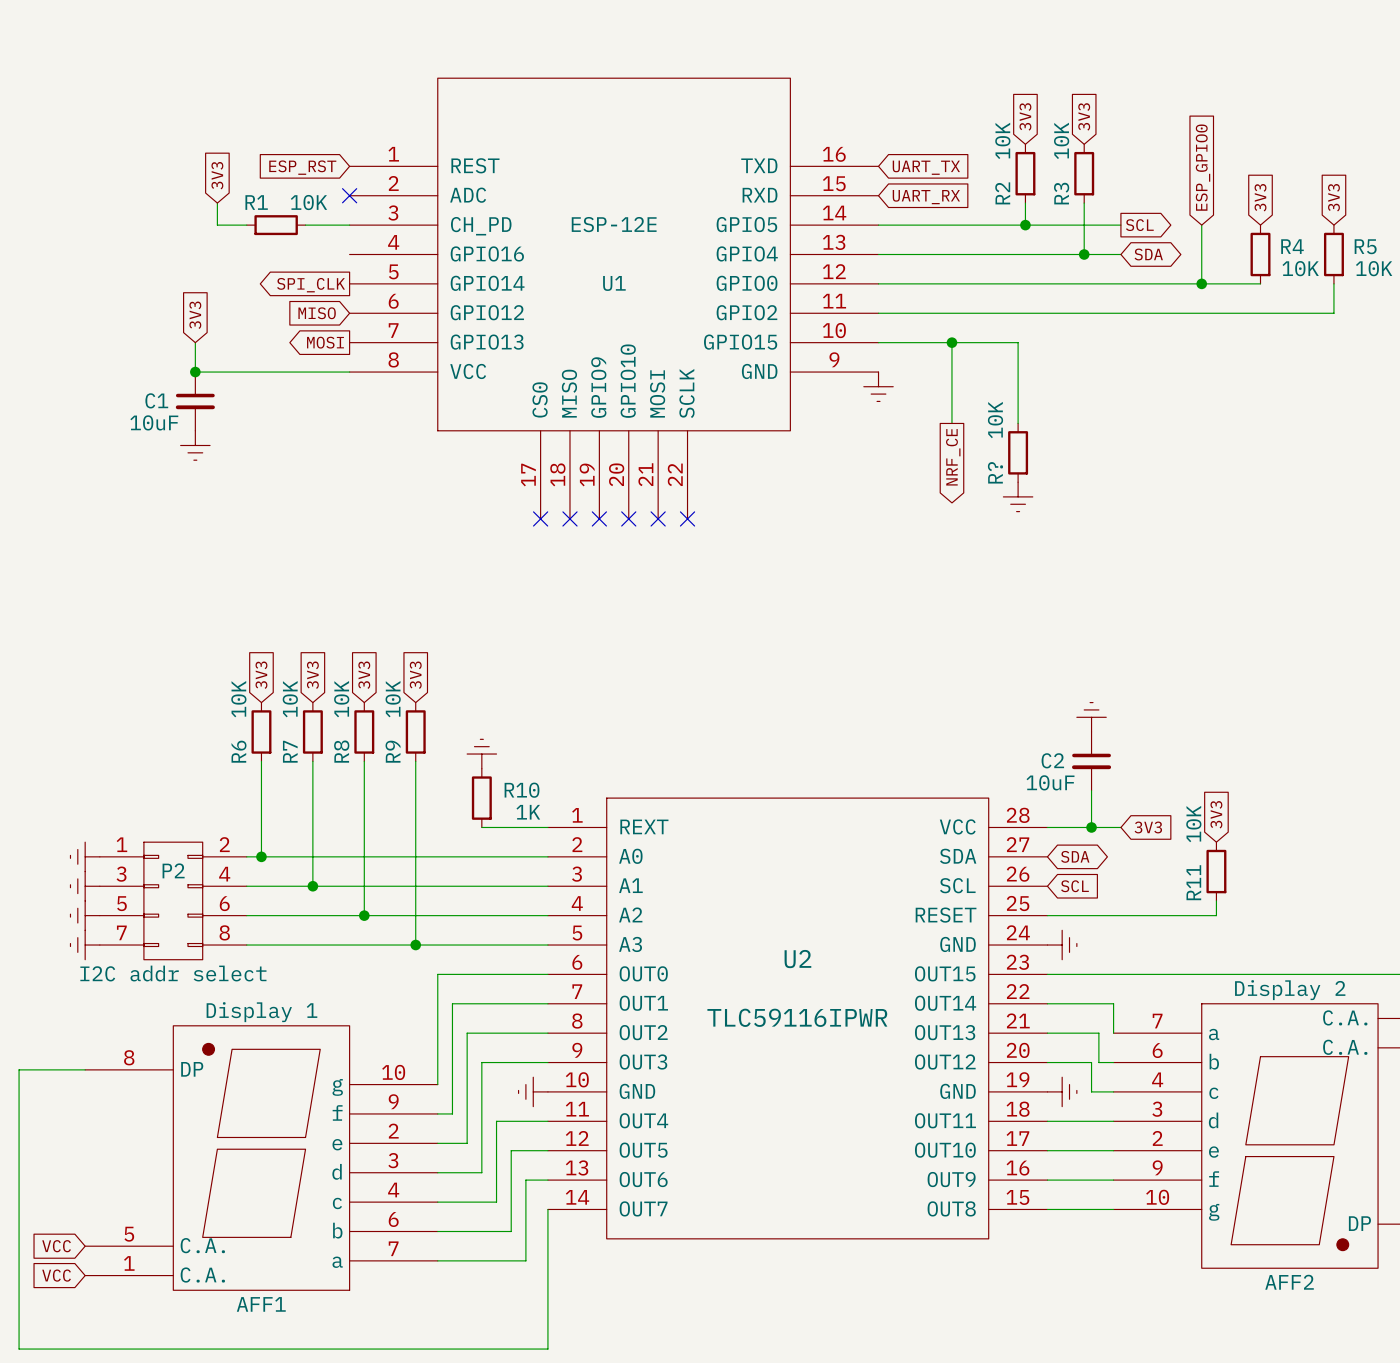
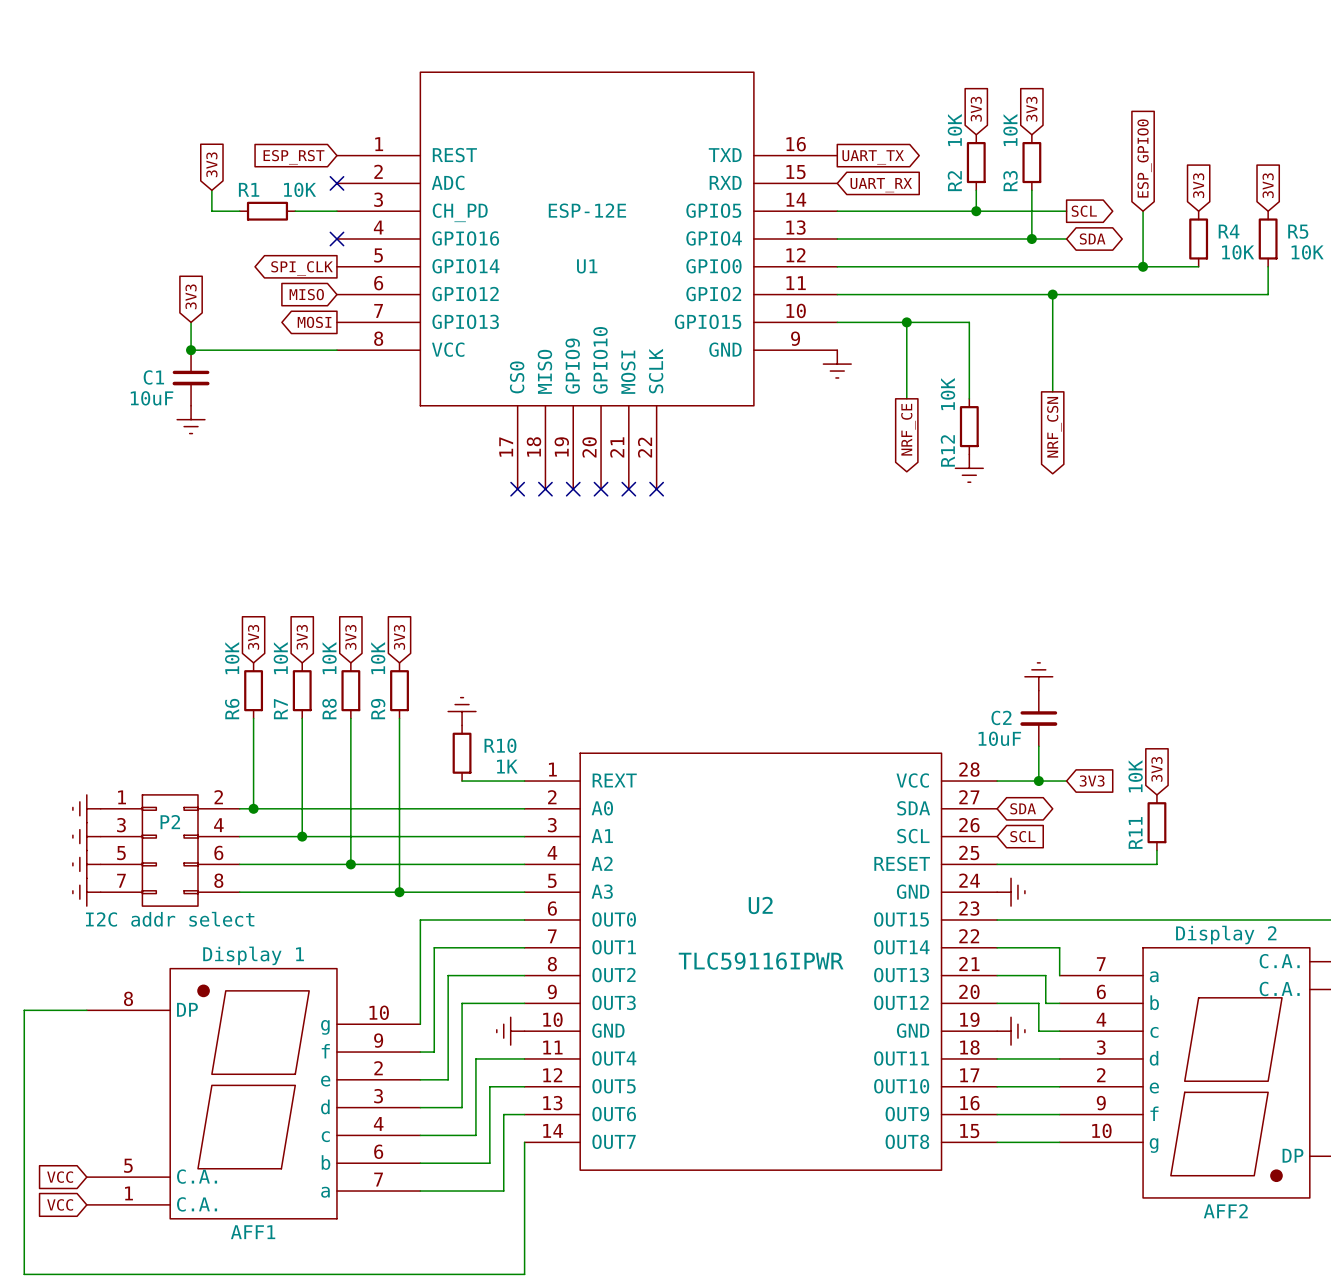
global label shape: input (926, 167) -> output (873, 157)
no-connect mark: none -> (336, 238)
wire: none -> (1052, 294) (1052, 391)
junction: none -> (1052, 294)
global label: none -> NRF_CSN (1054, 427)
R? name: R? (995, 472) -> R12 (947, 450)

